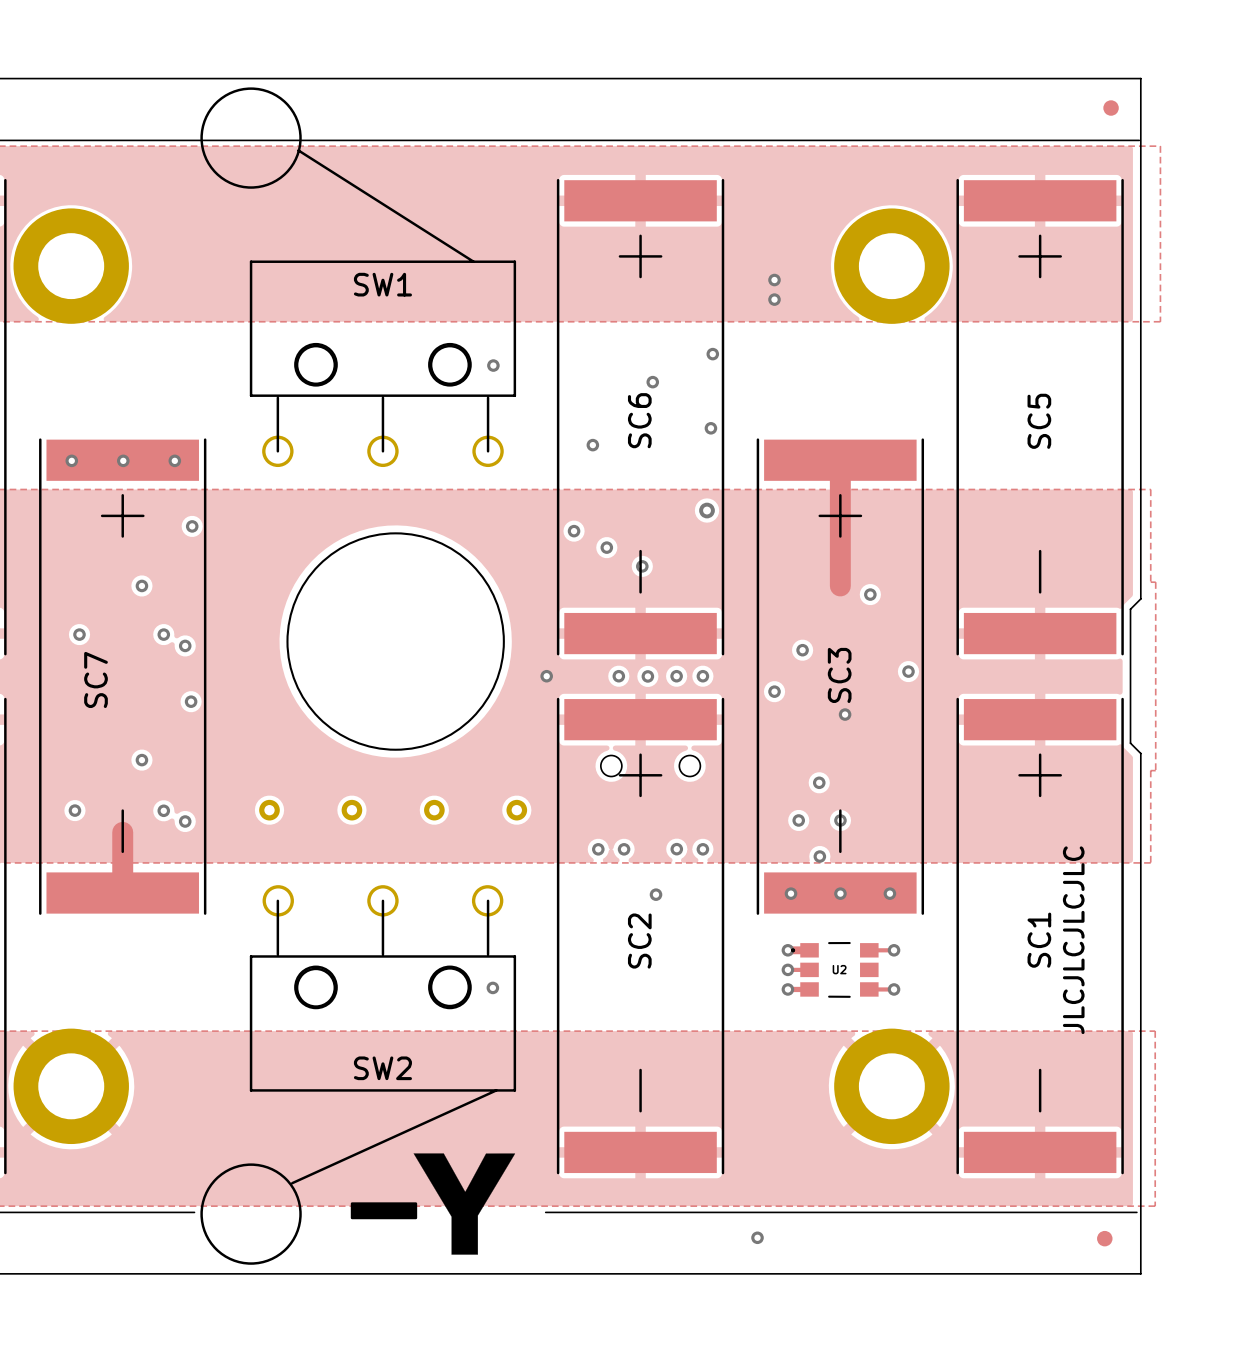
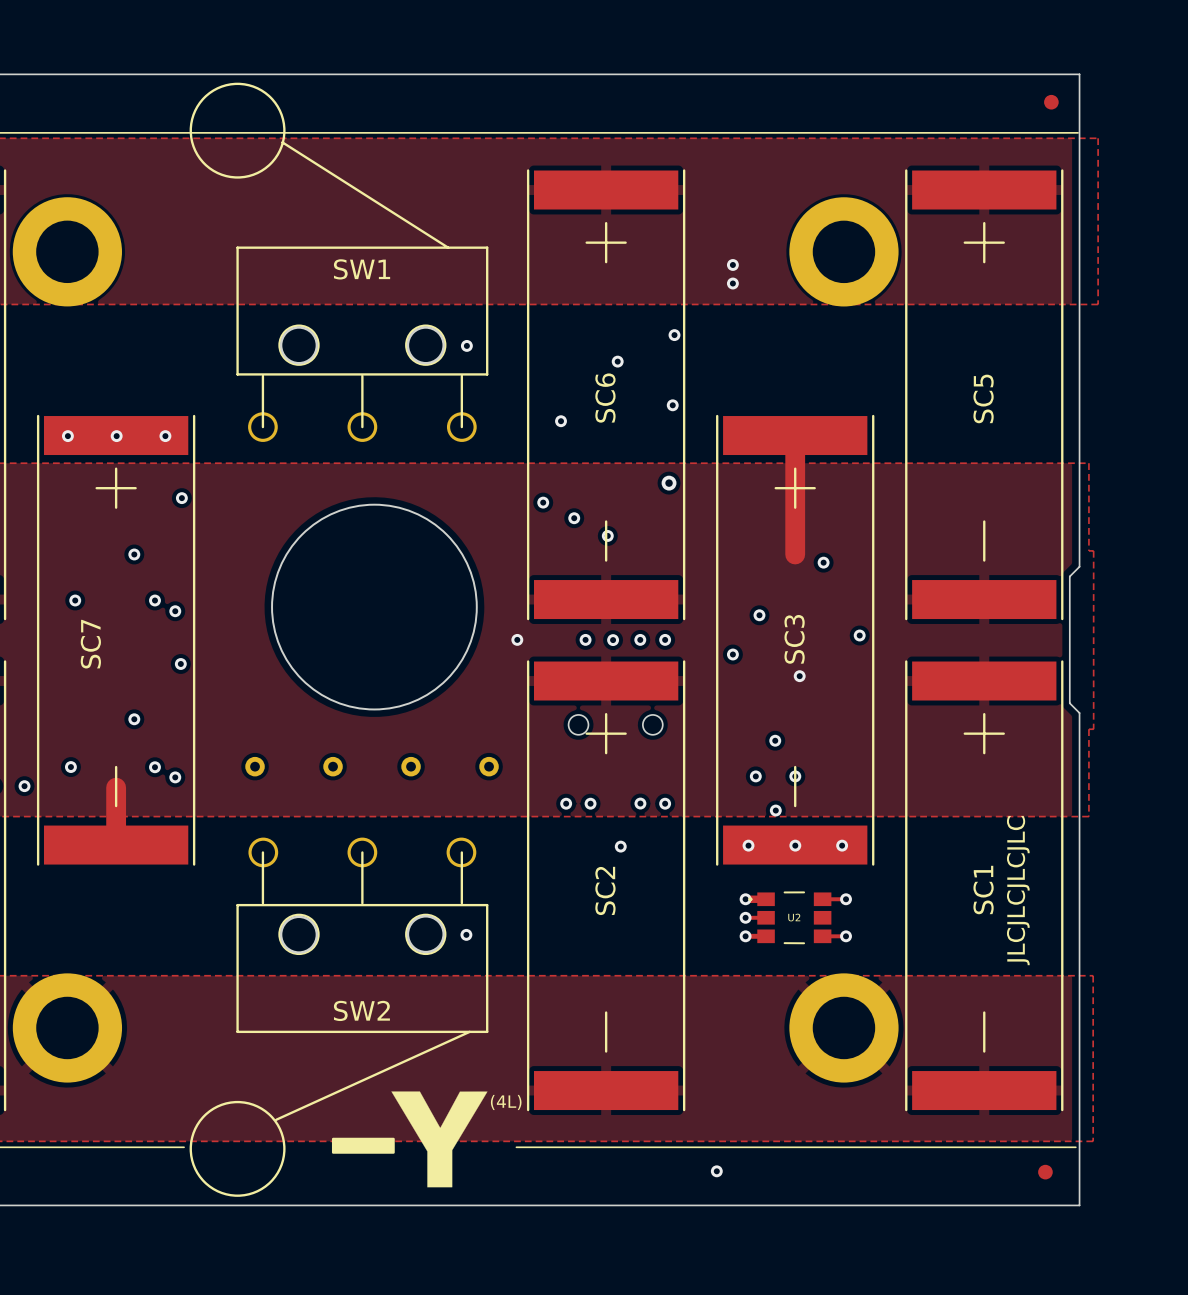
via: none -> (24, 786)
text: none -> (4L) (506, 1102)

